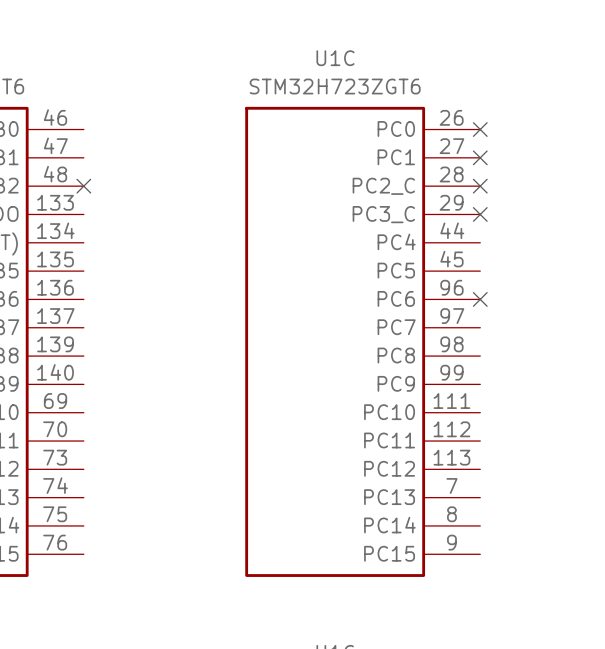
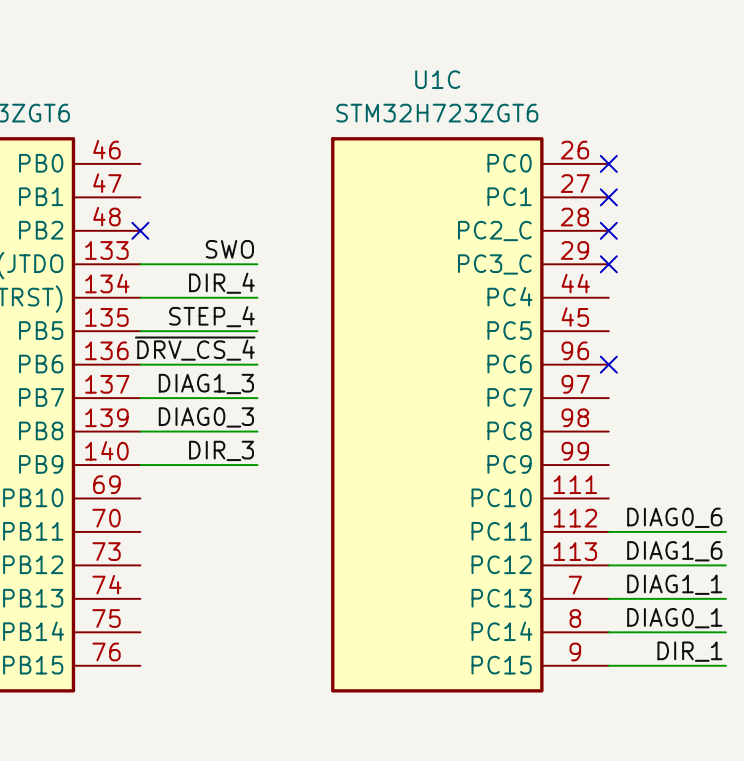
label: none -> SWO (229, 249)
wire: none -> (140, 264) (257, 264)
label: none -> DIR_4 (221, 283)
wire: none -> (140, 297) (257, 297)
label: none -> STEP_4 (211, 316)
wire: none -> (140, 331) (257, 331)
label: none -> ~{DRV_CS_4} (195, 348)
wire: none -> (140, 364) (257, 364)
label: none -> DIAG1_3 (206, 383)
wire: none -> (140, 398) (257, 398)
label: none -> DIAG0_3 (206, 417)
wire: none -> (140, 431) (257, 431)
label: none -> DIR_3 (221, 450)
wire: none -> (140, 465) (257, 465)
label: none -> DIAG0_6 (674, 517)
wire: none -> (608, 531) (725, 531)
label: none -> DIAG1_6 (674, 551)
wire: none -> (608, 565) (725, 565)
label: none -> DIAG1_1 (674, 584)
wire: none -> (608, 598) (725, 598)
label: none -> DIAG0_1 (674, 618)
wire: none -> (608, 632) (725, 632)
label: none -> DIR_1 (689, 651)
wire: none -> (608, 665) (725, 665)

